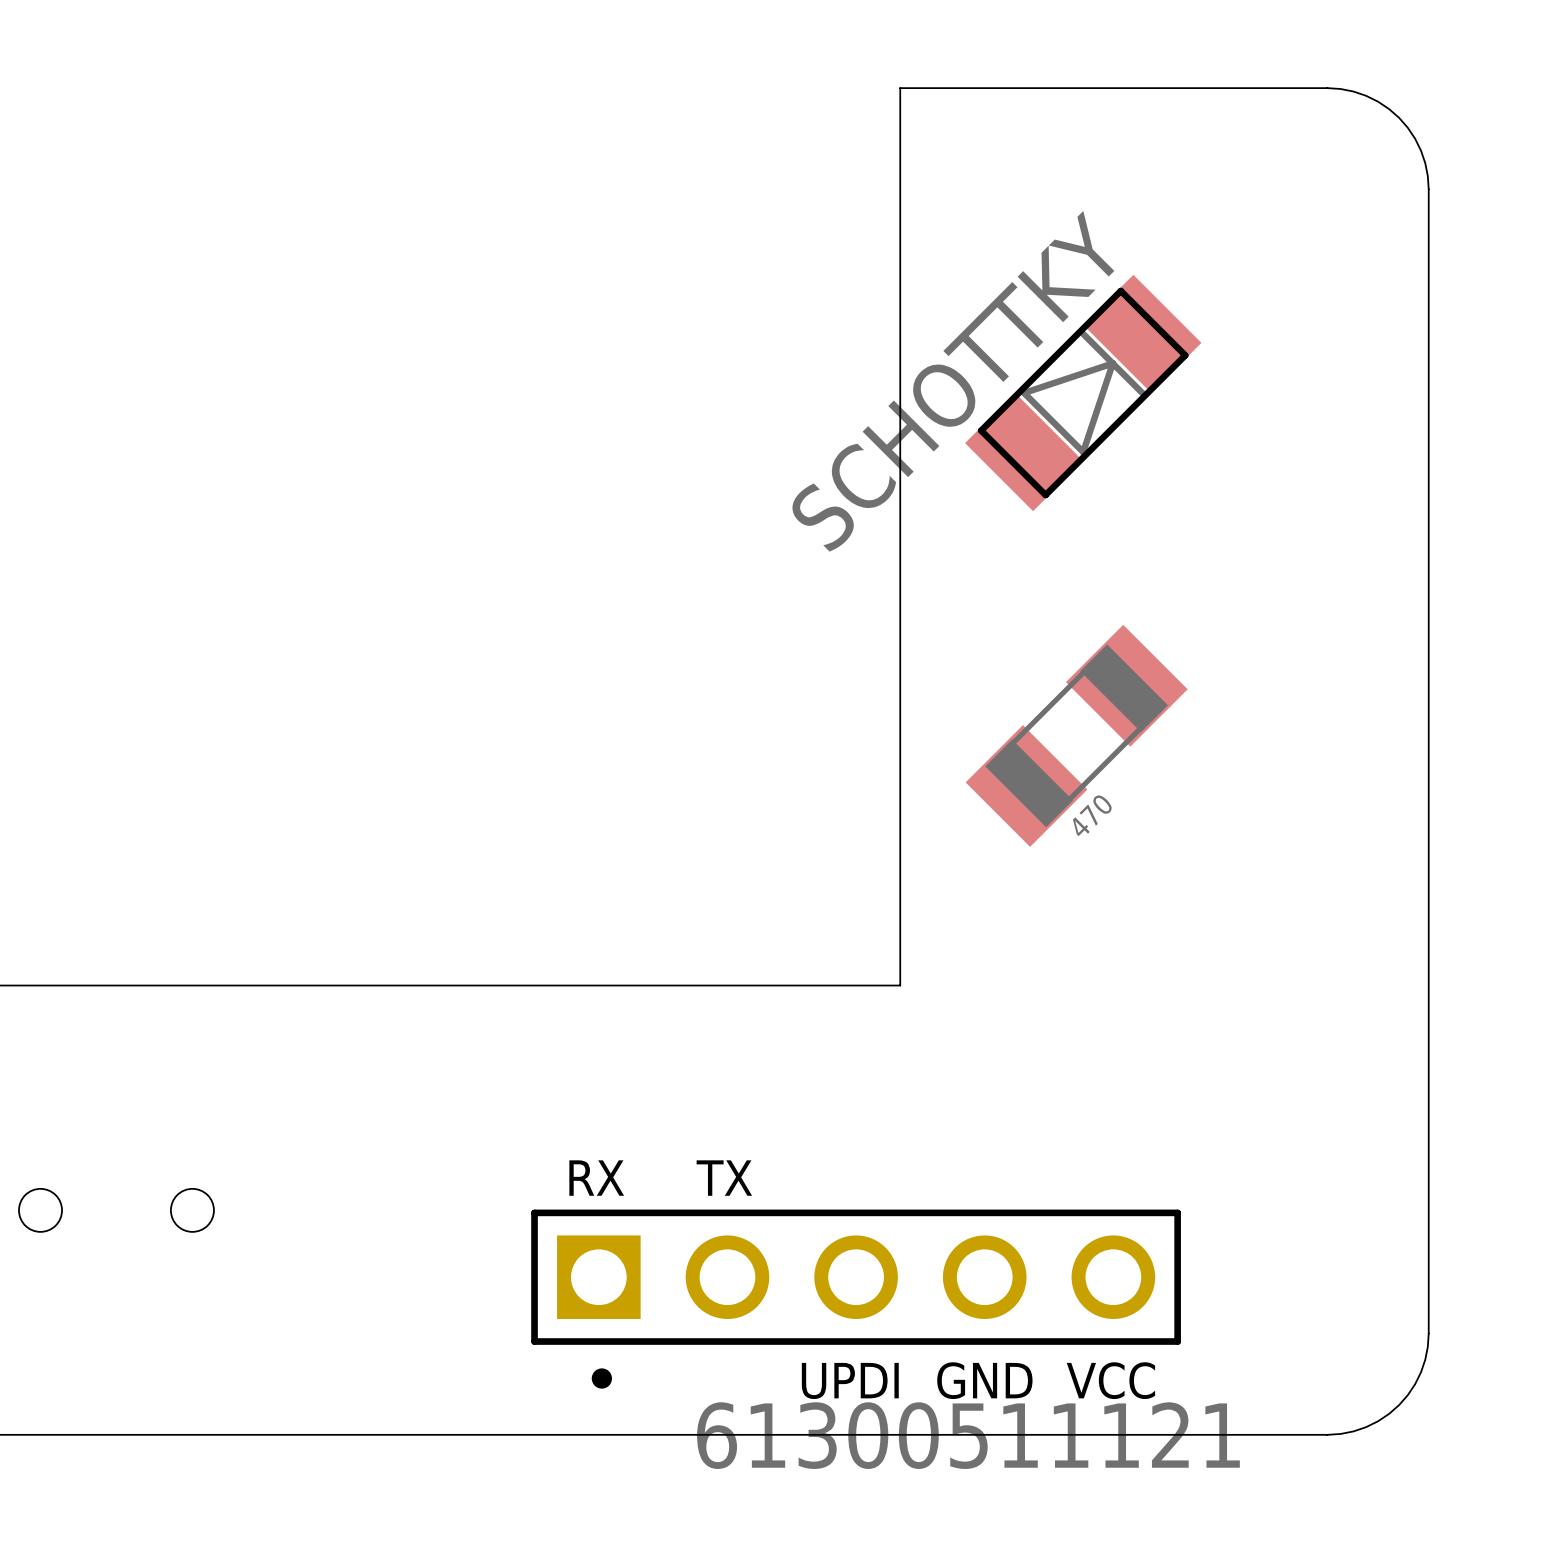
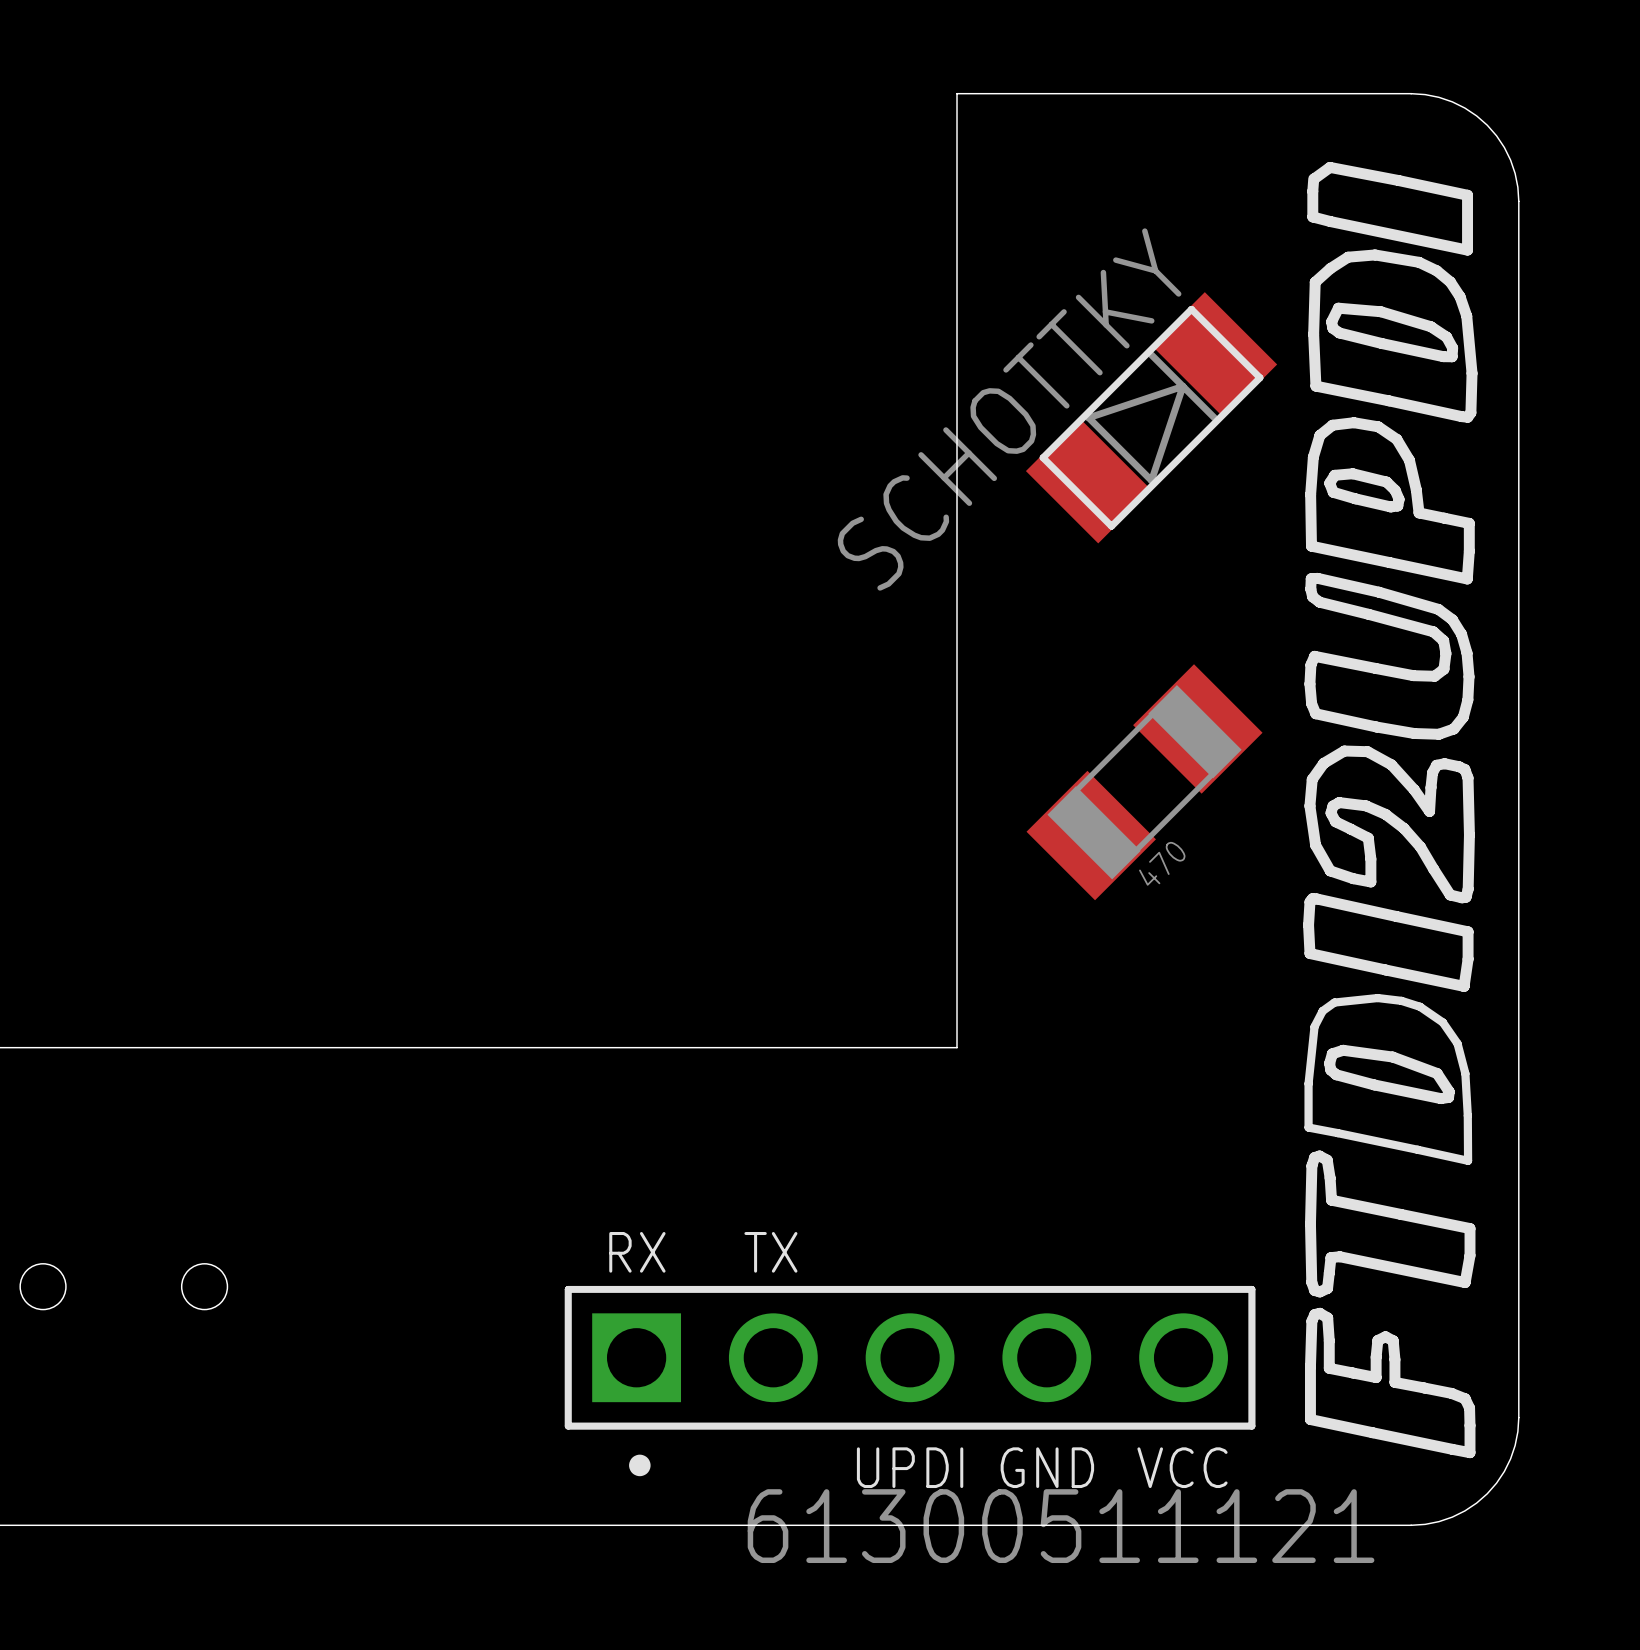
line: none -> (1313, 178) (1312, 216) (1467, 250) (1467, 195) (1330, 167) (1314, 178)
line: none -> (1375, 254) (1348, 257) (1330, 268) (1315, 282) (1313, 334) (1315, 386) (1467, 417) (1470, 412) (1472, 373) (1466, 316) (1460, 296) (1450, 282) (1436, 270) (1419, 262) (1375, 254)
line: none -> (1338, 308) (1380, 311) (1431, 326) (1446, 337) (1452, 348) (1452, 356) (1443, 356) (1339, 332) (1332, 328) (1331, 321) (1338, 308)
line: none -> (1353, 422) (1332, 425) (1319, 435) (1313, 457) (1310, 494) (1311, 546) (1467, 579) (1469, 523) (1419, 512) (1409, 460) (1396, 439) (1378, 426) (1353, 422)
line: none -> (1352, 473) (1386, 482) (1395, 490) (1399, 499) (1397, 505) (1390, 506) (1333, 492) (1329, 483) (1334, 475) (1352, 473)
line: none -> (1317, 578) (1311, 578) (1310, 589) (1312, 596) (1319, 602) (1433, 631) (1443, 640) (1445, 653) (1443, 669) (1434, 676) (1413, 675) (1314, 656) (1310, 664) (1309, 684) (1311, 703) (1315, 713) (1414, 733) (1438, 734) (1453, 728) (1463, 717) (1467, 699) (1469, 676) (1467, 653) (1461, 634) (1452, 619) (1438, 609) (1379, 592) (1317, 578)
line: none -> (1344, 751) (1323, 763) (1312, 779) (1309, 806) (1315, 845) (1330, 870) (1370, 881) (1368, 838) (1335, 821) (1331, 813) (1333, 806) (1339, 802) (1366, 805) (1385, 814) (1404, 828) (1420, 847) (1450, 895) (1466, 897) (1468, 889) (1469, 835) (1468, 777) (1464, 769) (1444, 763) (1436, 765) (1432, 772) (1429, 811) (1414, 789) (1391, 764) (1367, 751) (1344, 751)
line: none -> (1312, 898) (1309, 901) (1308, 925) (1309, 953) (1463, 986) (1468, 959) (1468, 931) (1312, 898)
line: none -> (1377, 998) (1334, 1002) (1322, 1011) (1314, 1026) (1308, 1083) (1308, 1127) (1468, 1160) (1465, 1073) (1457, 1043) (1442, 1022) (1420, 1006) (1401, 1000) (1377, 998)
line: none -> (1343, 1050) (1392, 1057) (1437, 1073) (1449, 1091) (1448, 1097) (1441, 1098) (1336, 1074) (1330, 1070) (1329, 1063) (1332, 1053) (1343, 1050)
line: none -> (1319, 1155) (1314, 1157) (1311, 1165) (1310, 1223) (1311, 1282) (1314, 1290) (1319, 1291) (1327, 1288) (1330, 1257) (1339, 1256) (1465, 1282) (1470, 1255) (1470, 1228) (1331, 1200) (1327, 1160) (1319, 1155)
line: none -> (1319, 1313) (1314, 1314) (1311, 1321) (1310, 1419) (1470, 1452) (1469, 1408) (1465, 1398) (1451, 1393) (1394, 1382) (1393, 1340) (1385, 1336) (1377, 1340) (1376, 1377) (1329, 1368) (1327, 1317) (1319, 1313)

